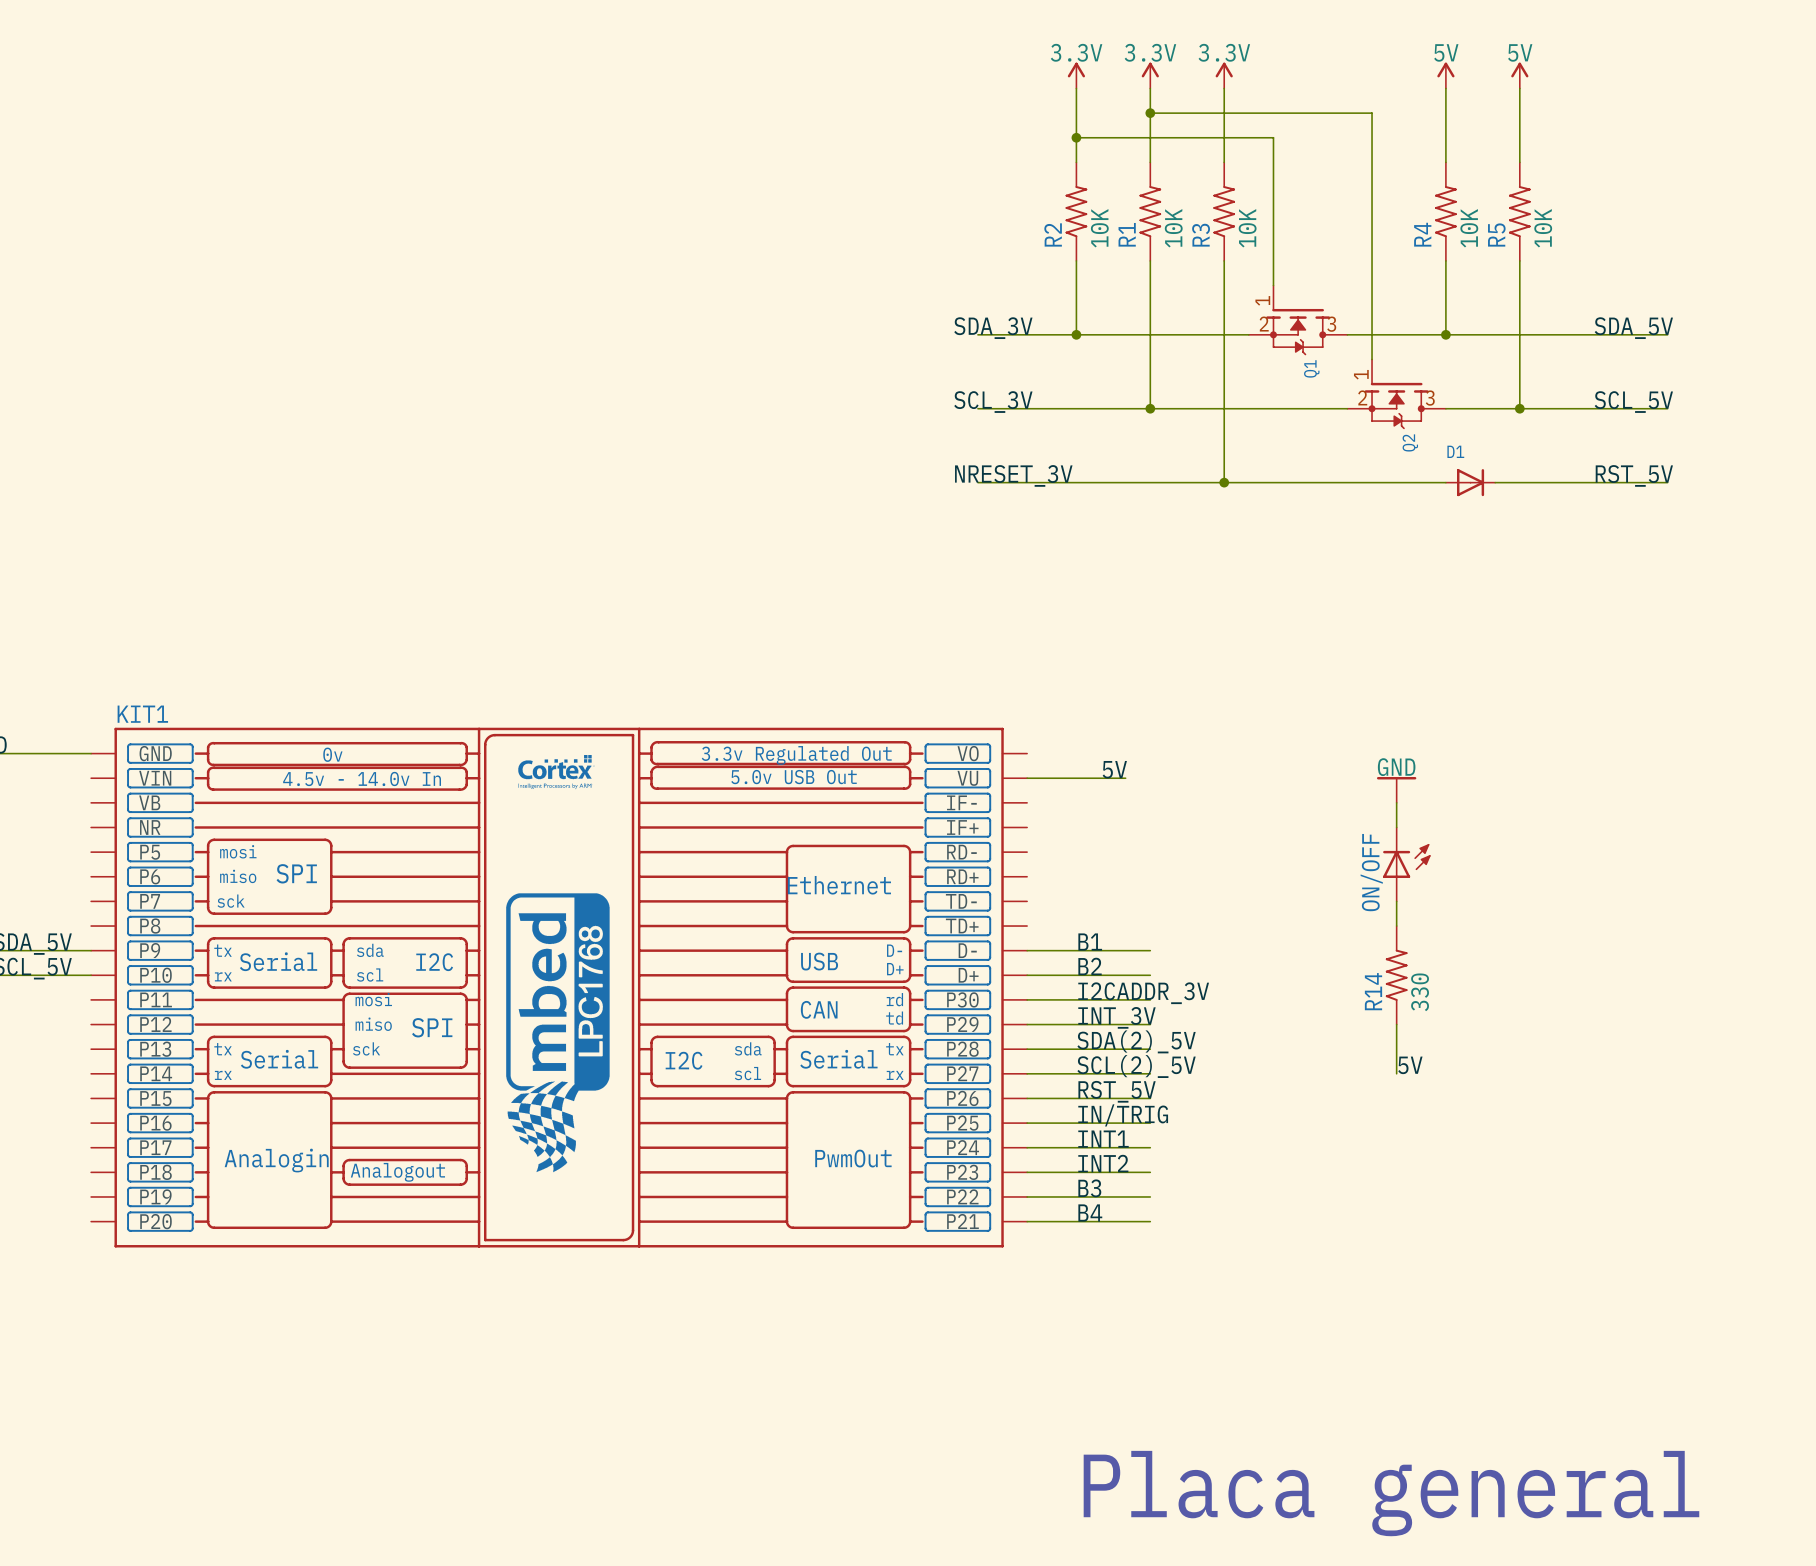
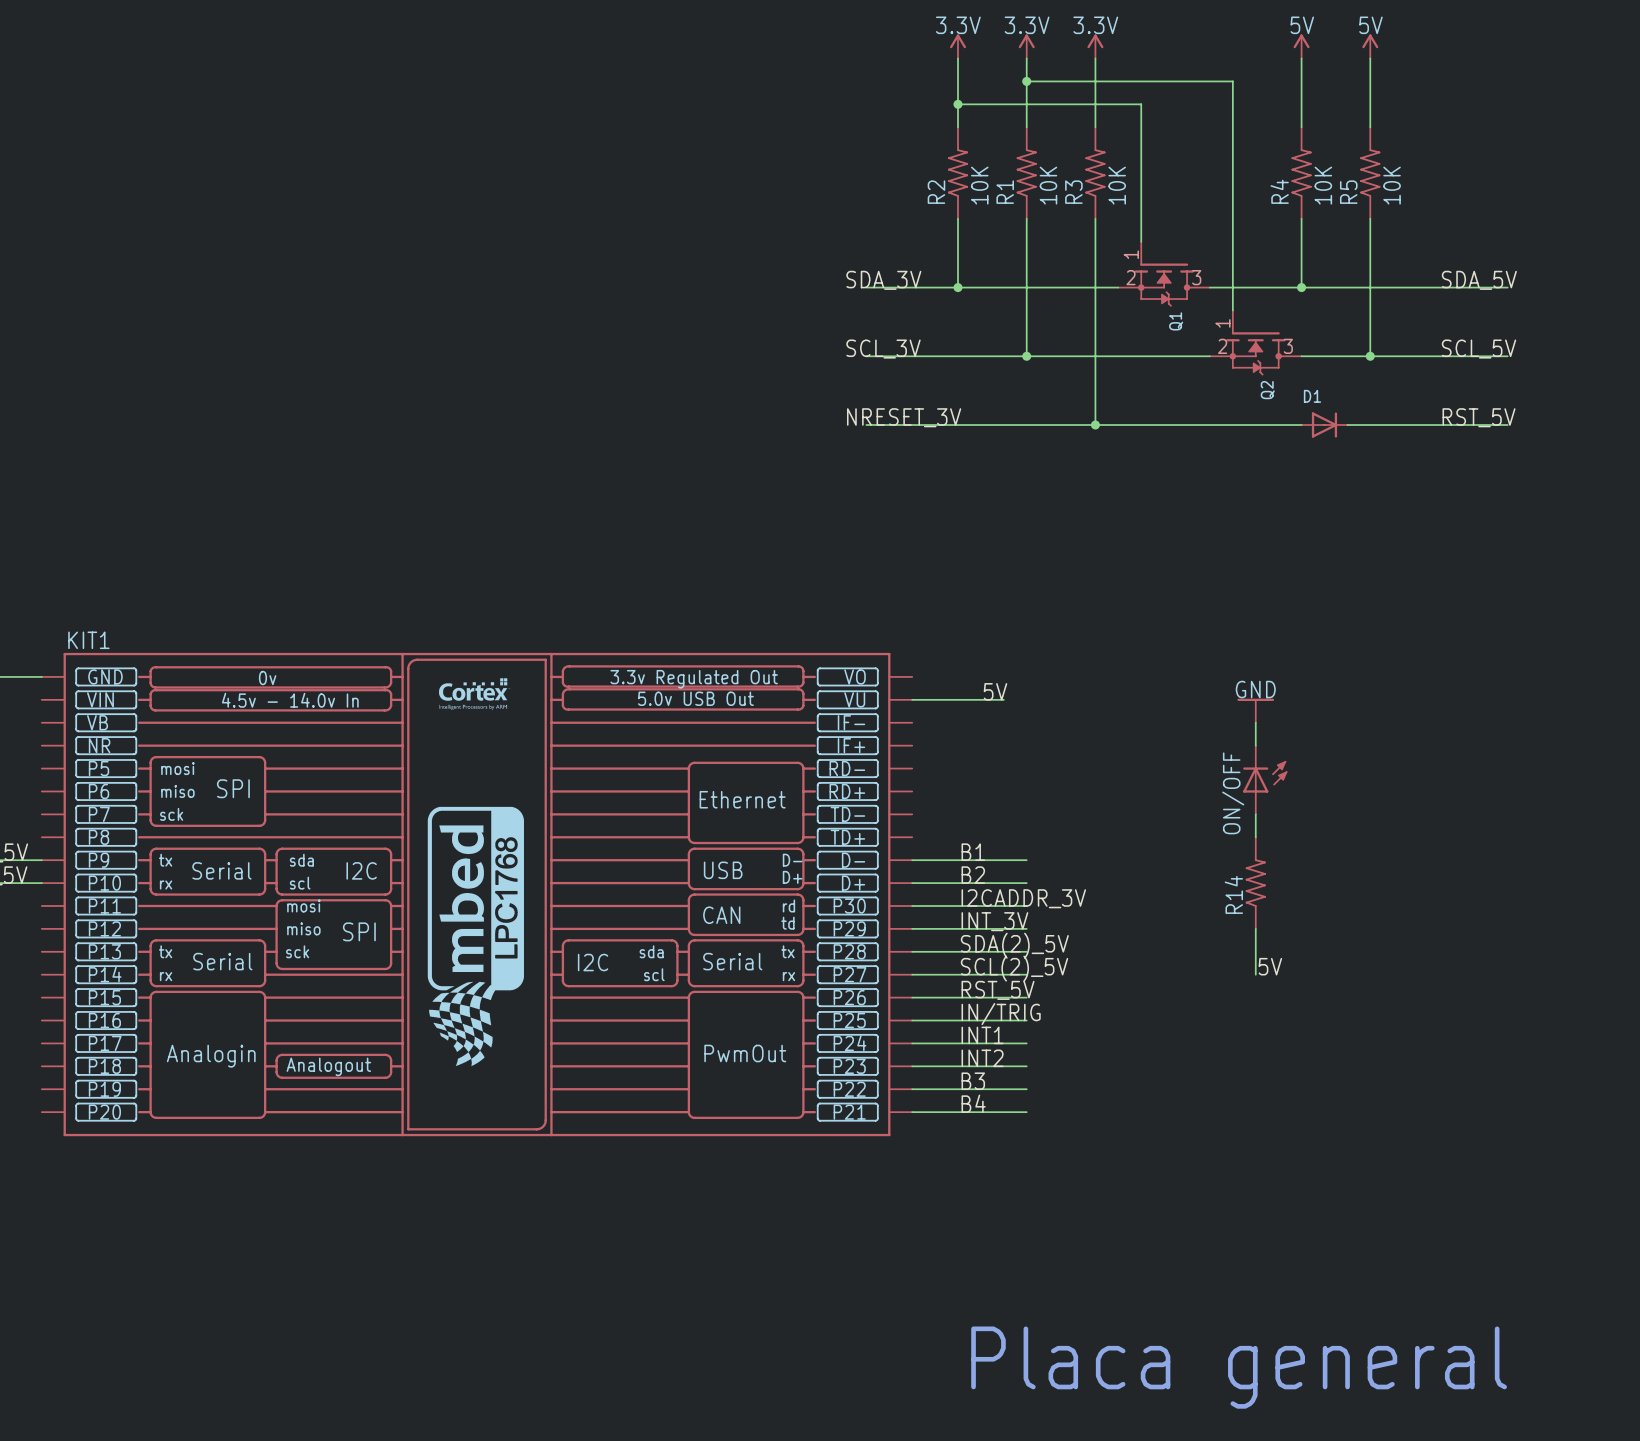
R14 value: 330 (1420, 992) -> none

